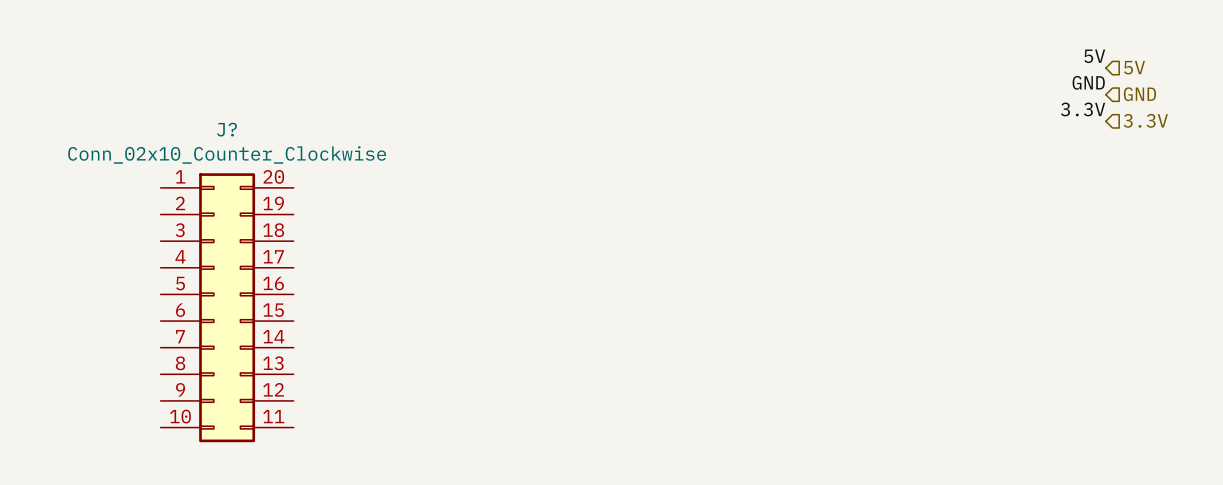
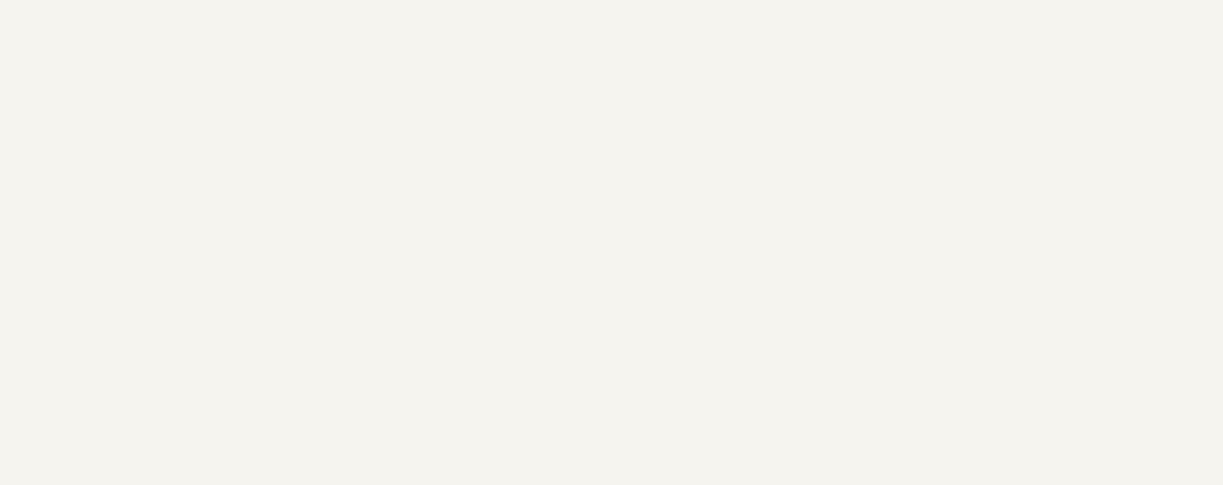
label: 5V (1094, 56) -> none
hierarchical label: 5V (1134, 67) -> none
label: GND (1088, 82) -> none
hierarchical label: GND (1139, 94) -> none
label: 3.3V (1083, 109) -> none
hierarchical label: 3.3V (1145, 120) -> none
J?: Conn_02x10_Counter_Clockwise (227, 307) -> none

